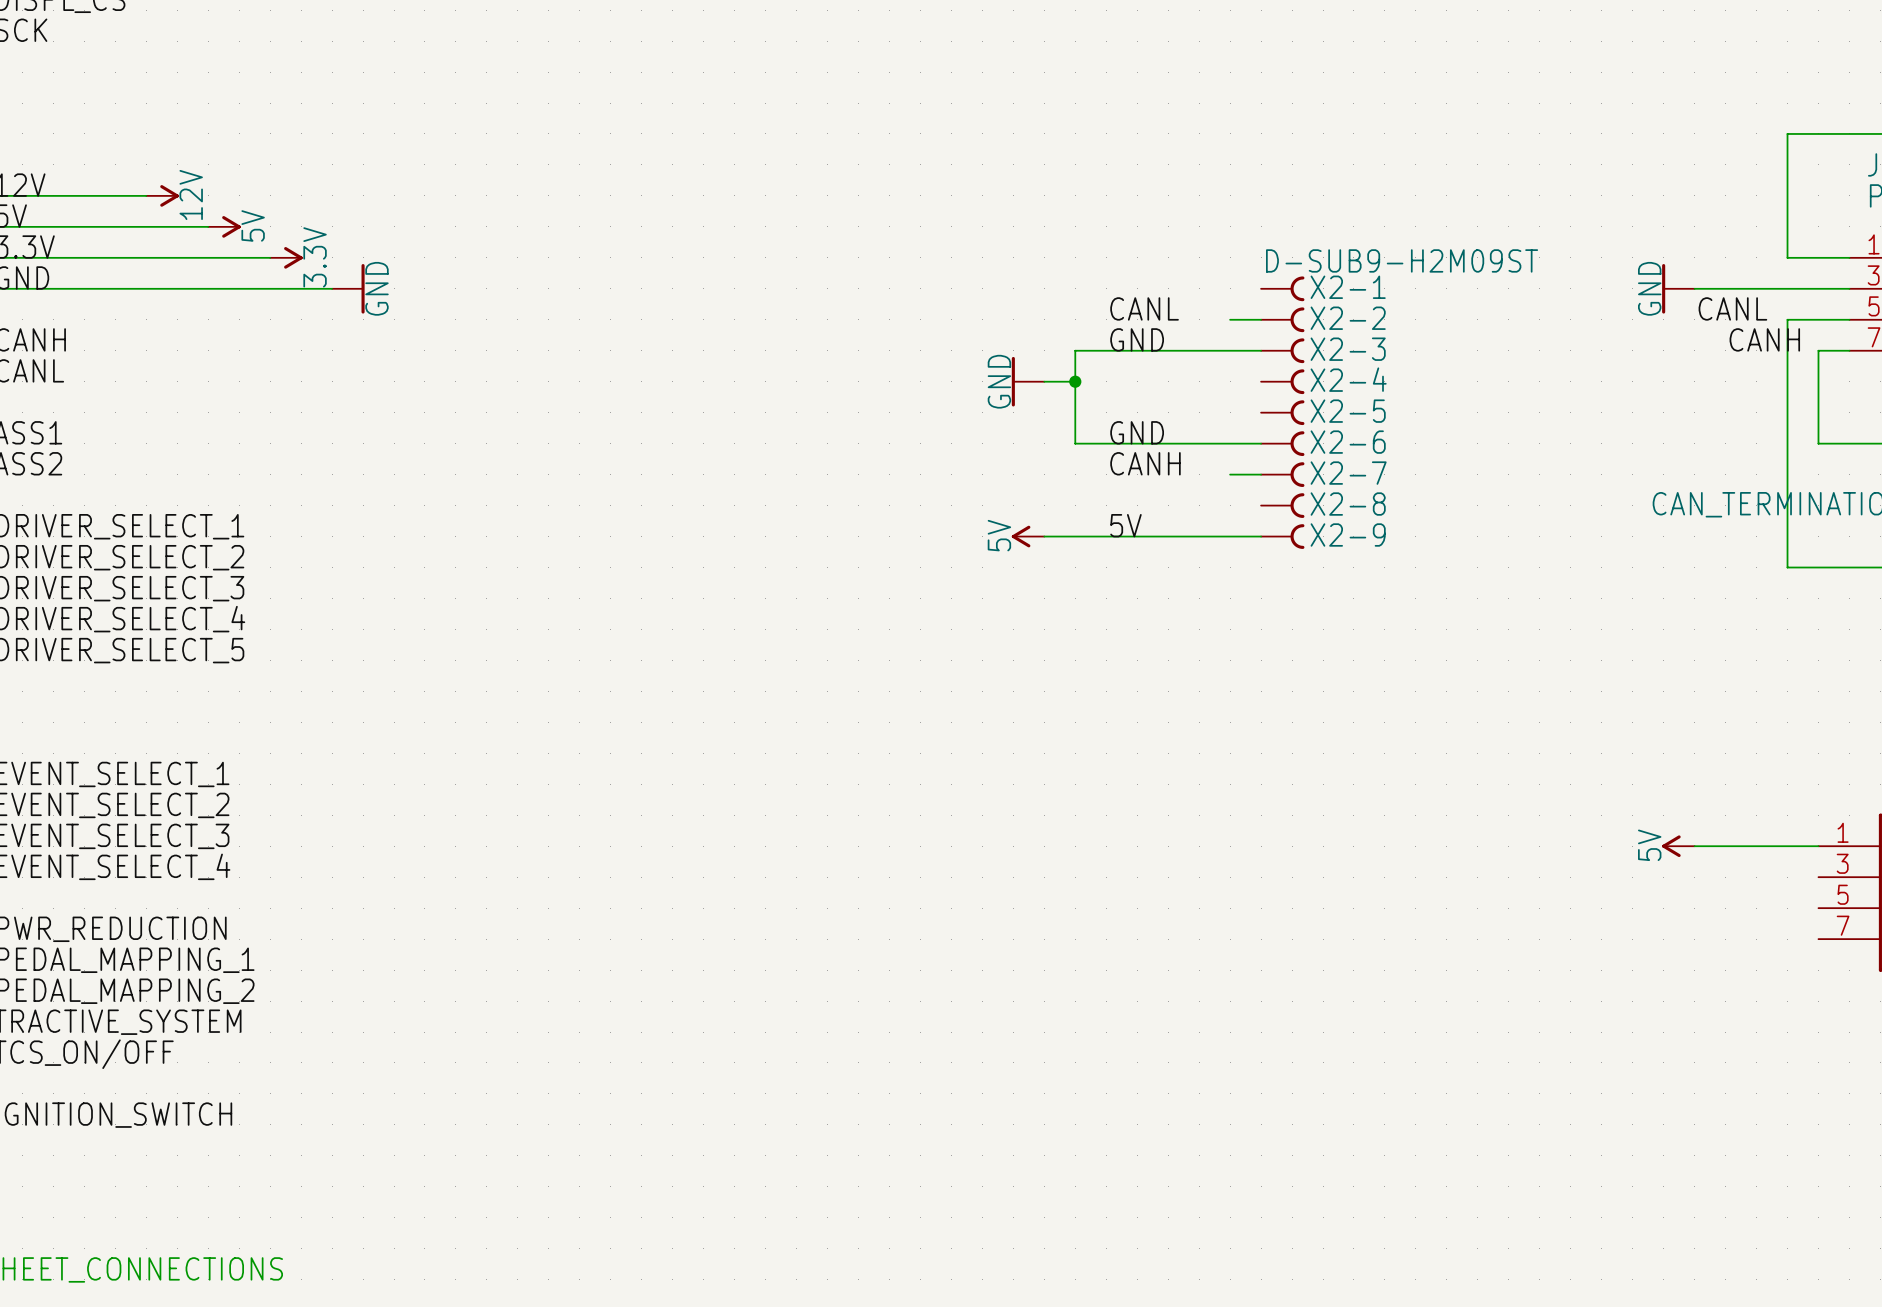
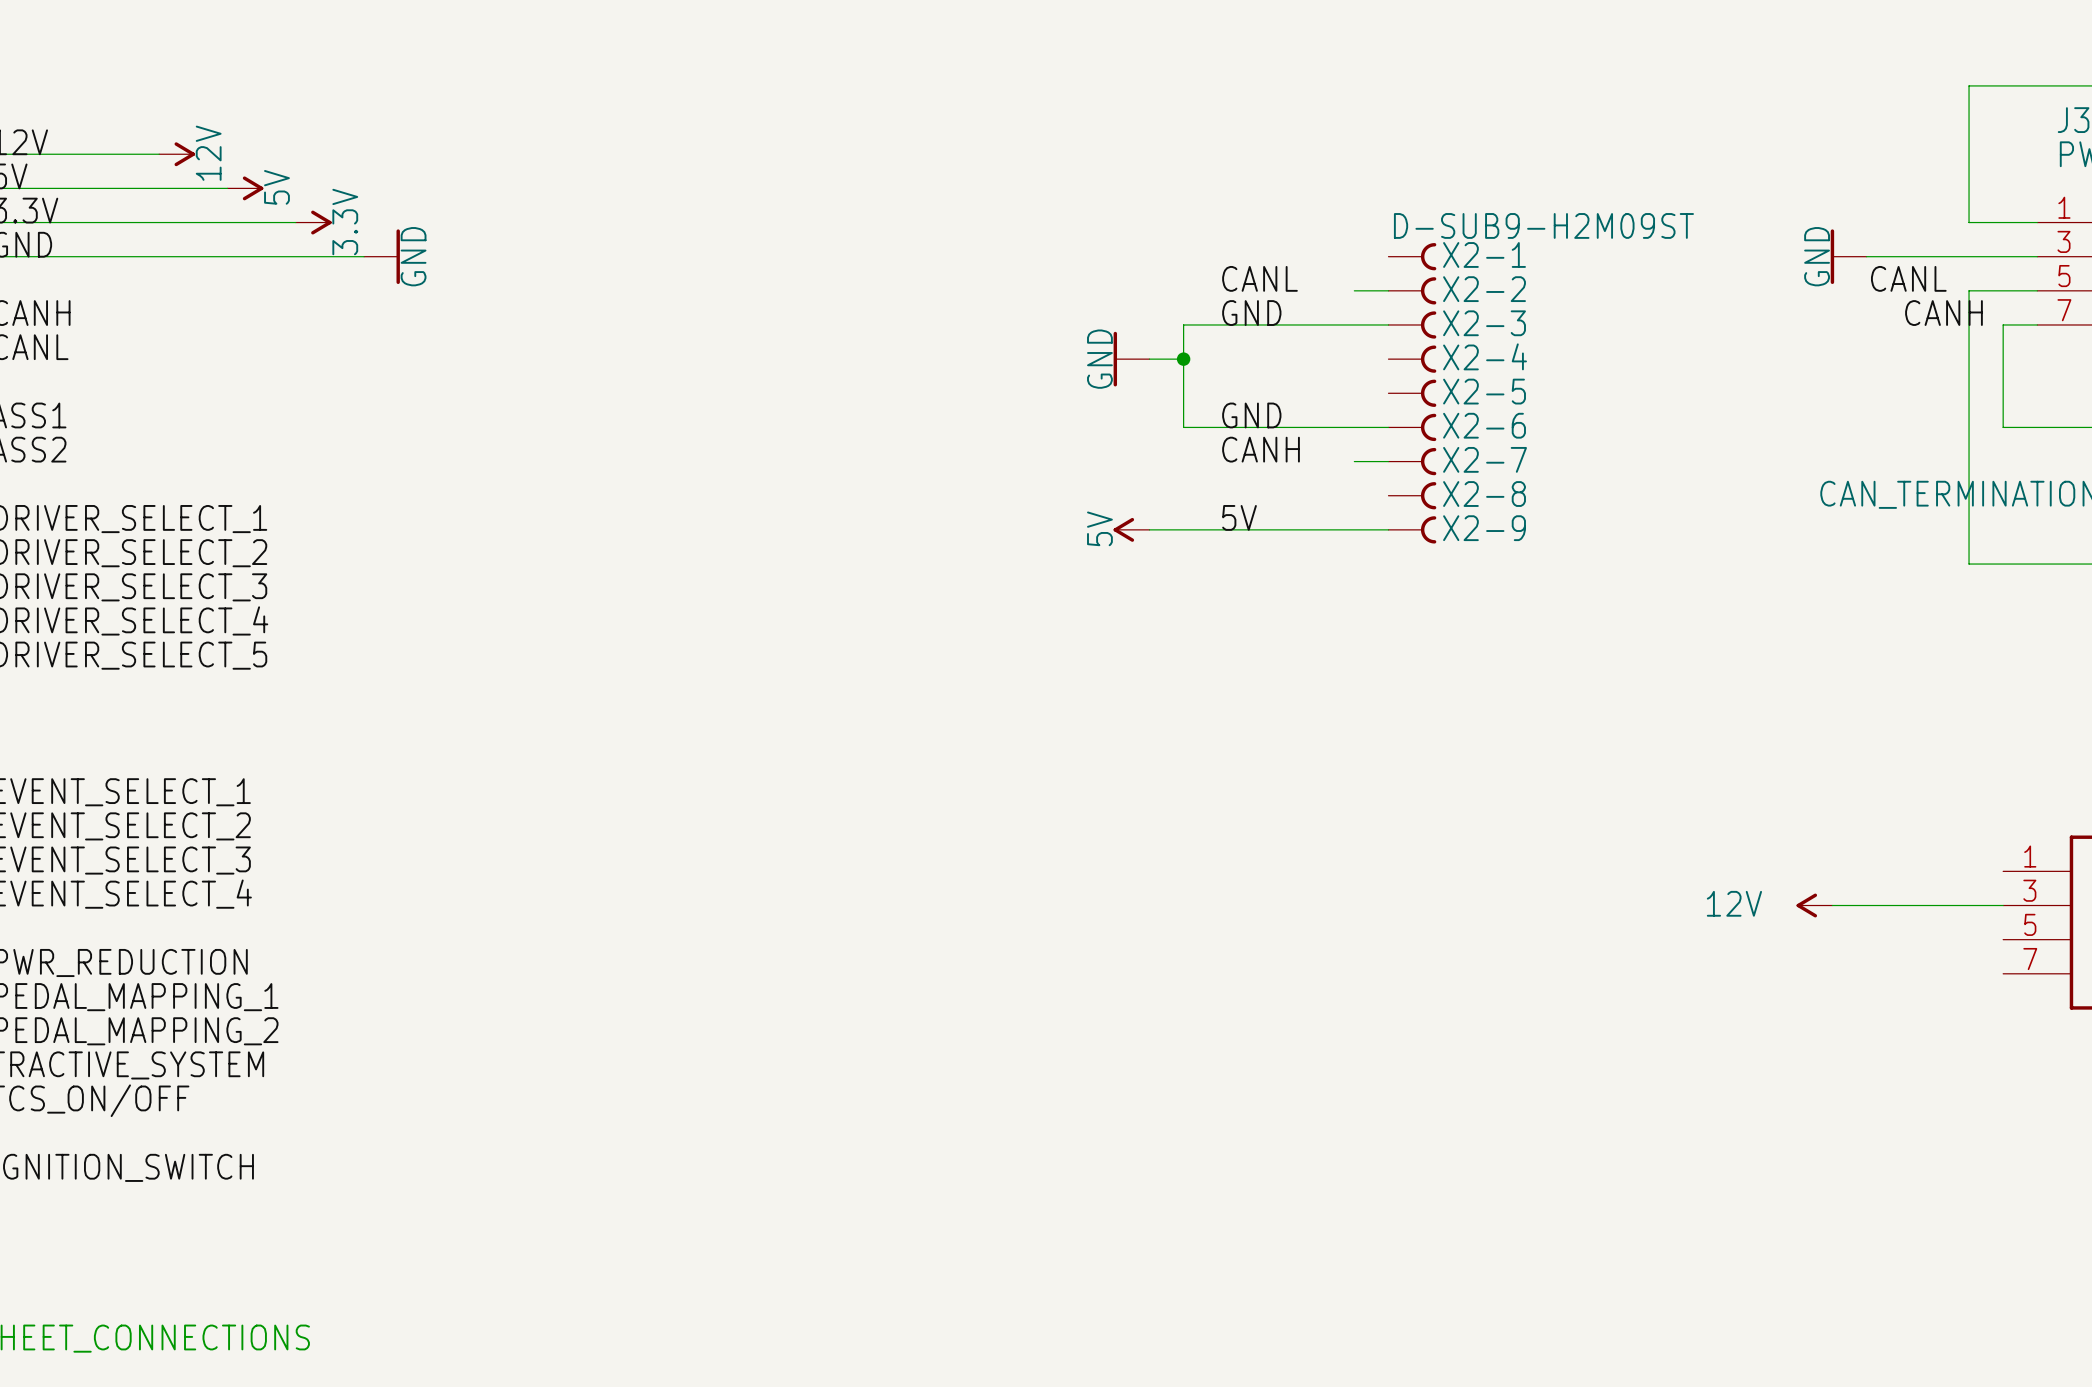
power symbol: 5V (1678, 846) -> none
wire: (1694, 846) (1818, 846) -> none
power symbol: none -> 12V (1814, 905)
wire: none -> (1832, 905) (2003, 905)

